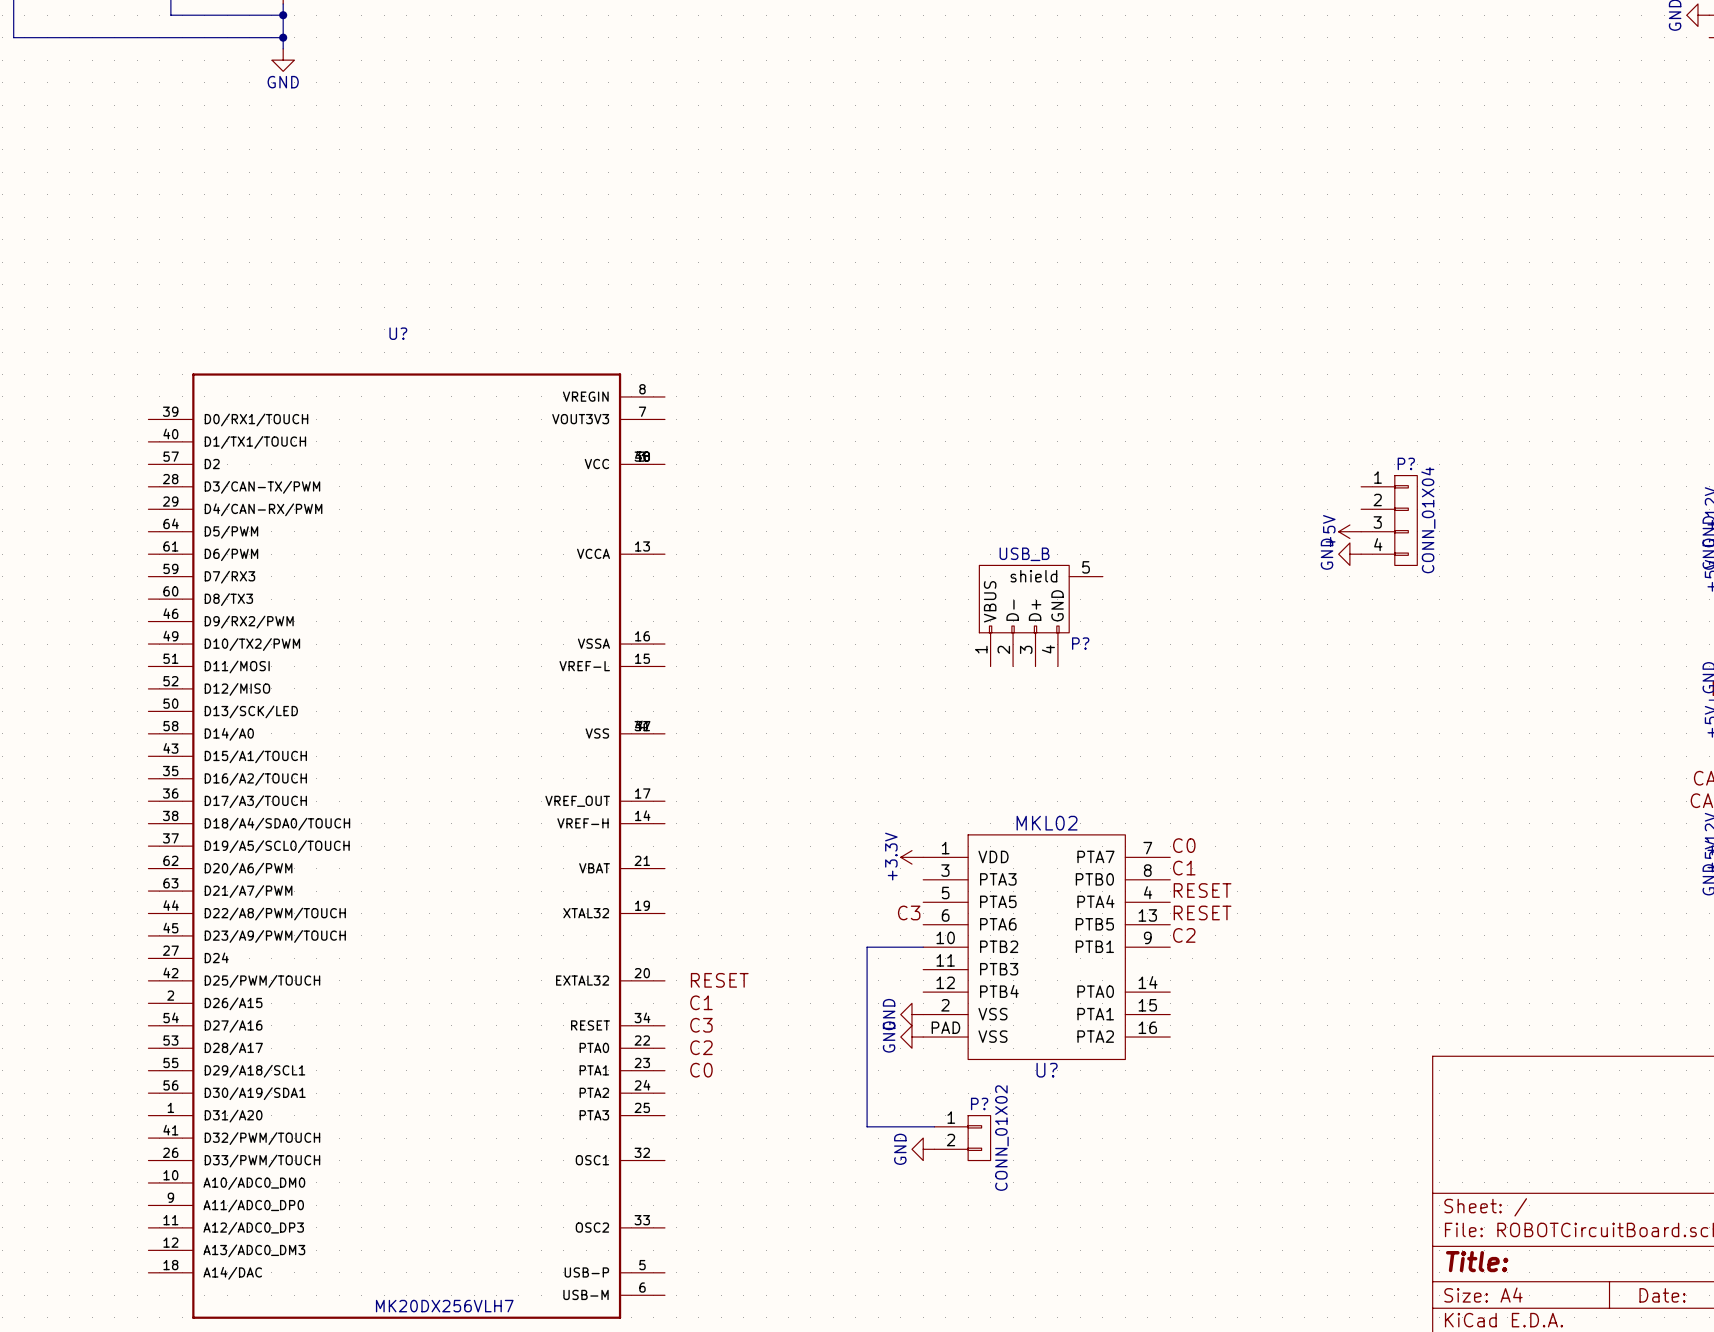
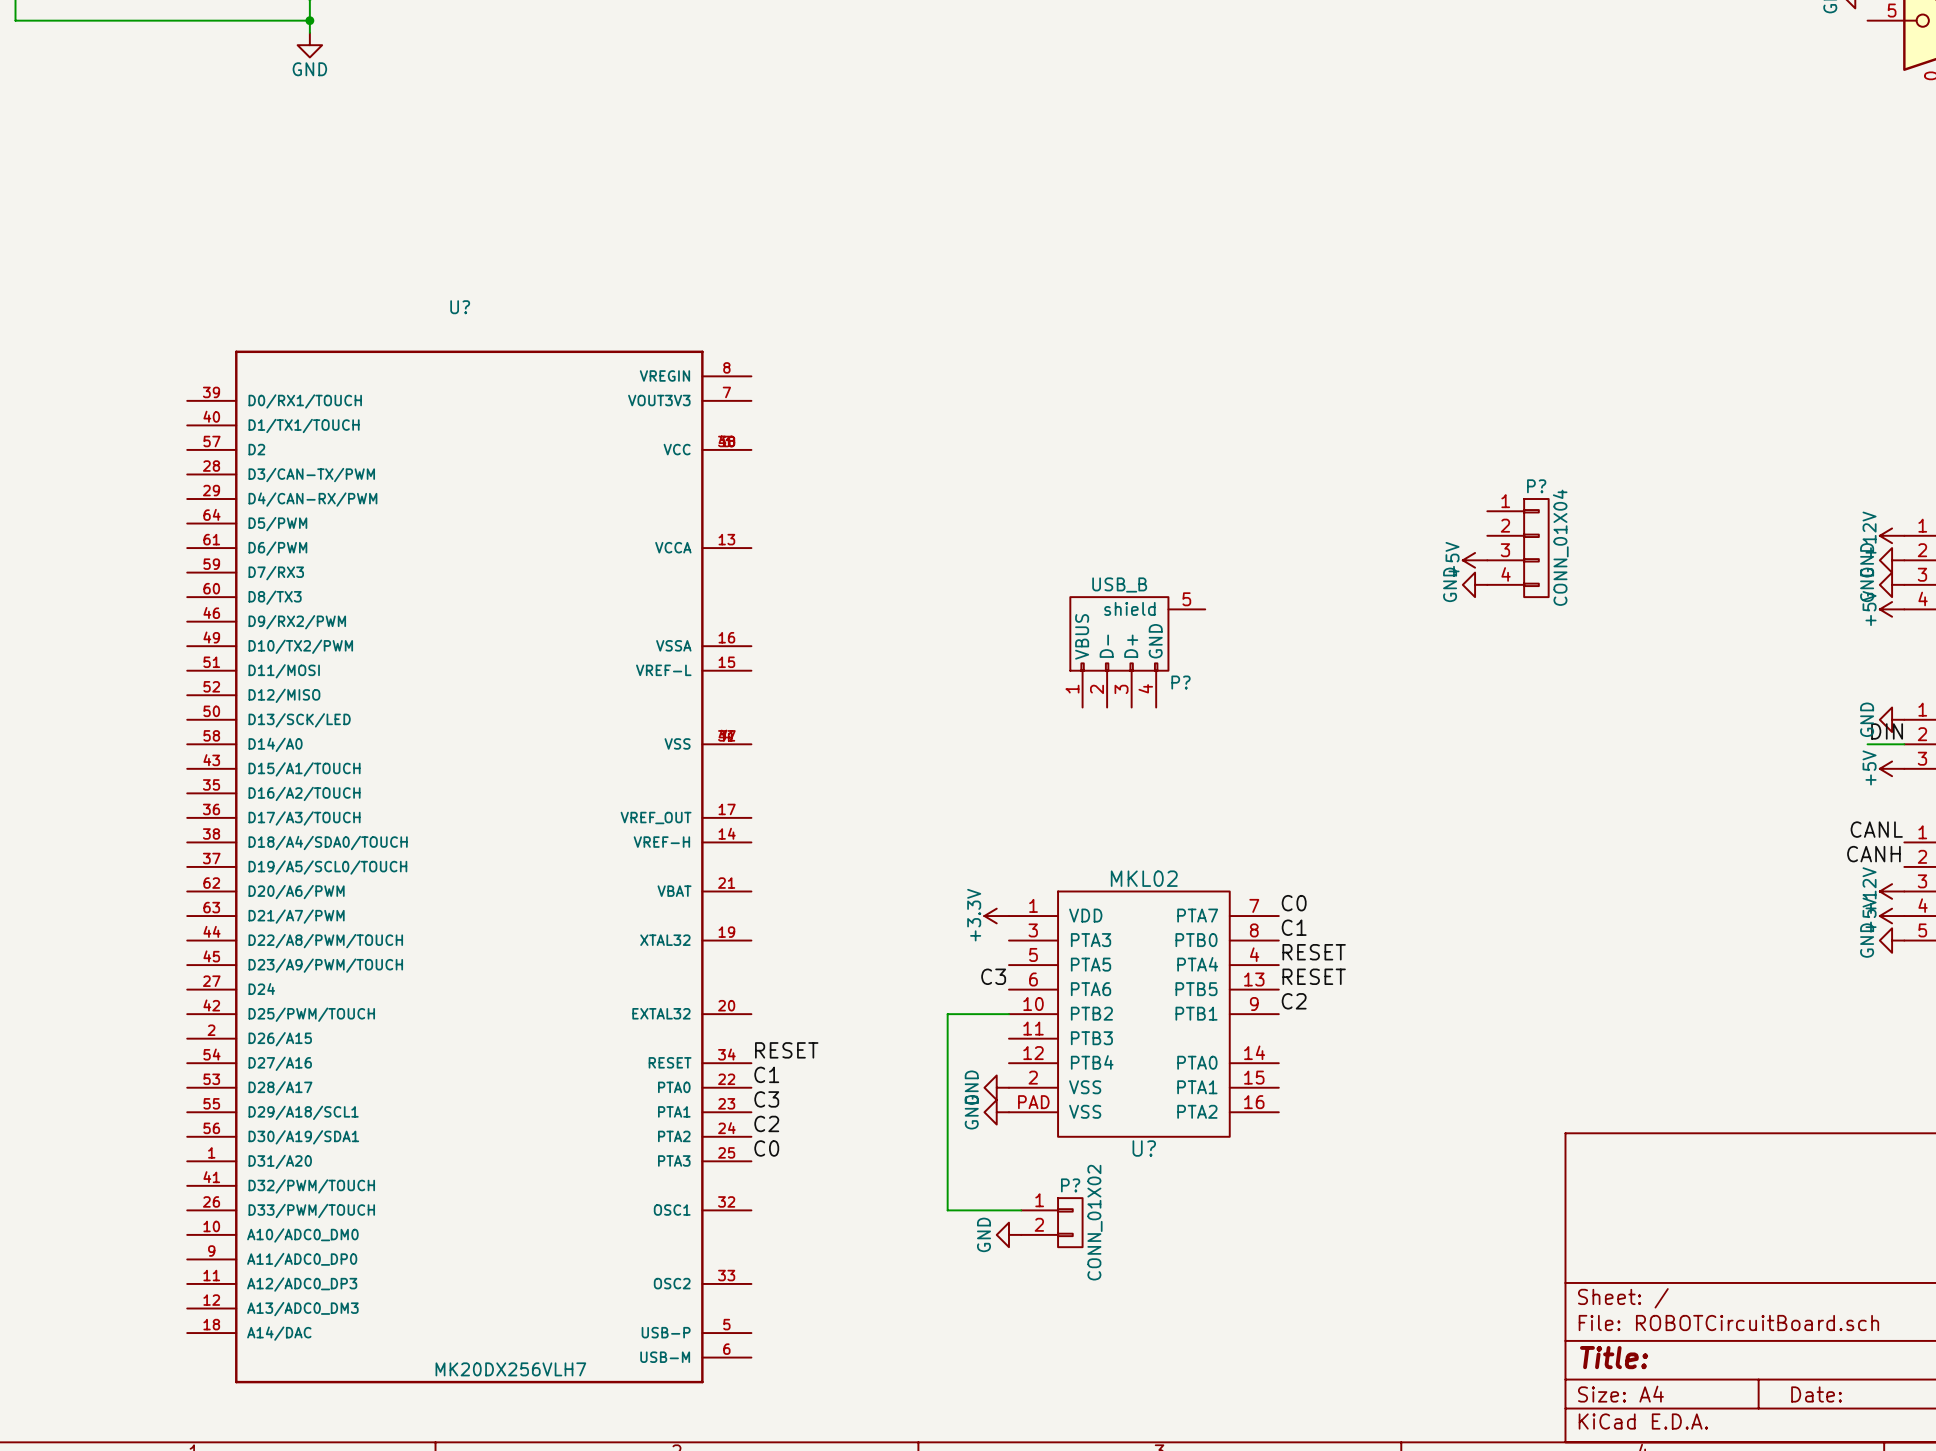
U? position: (406, 846) -> (469, 866)

